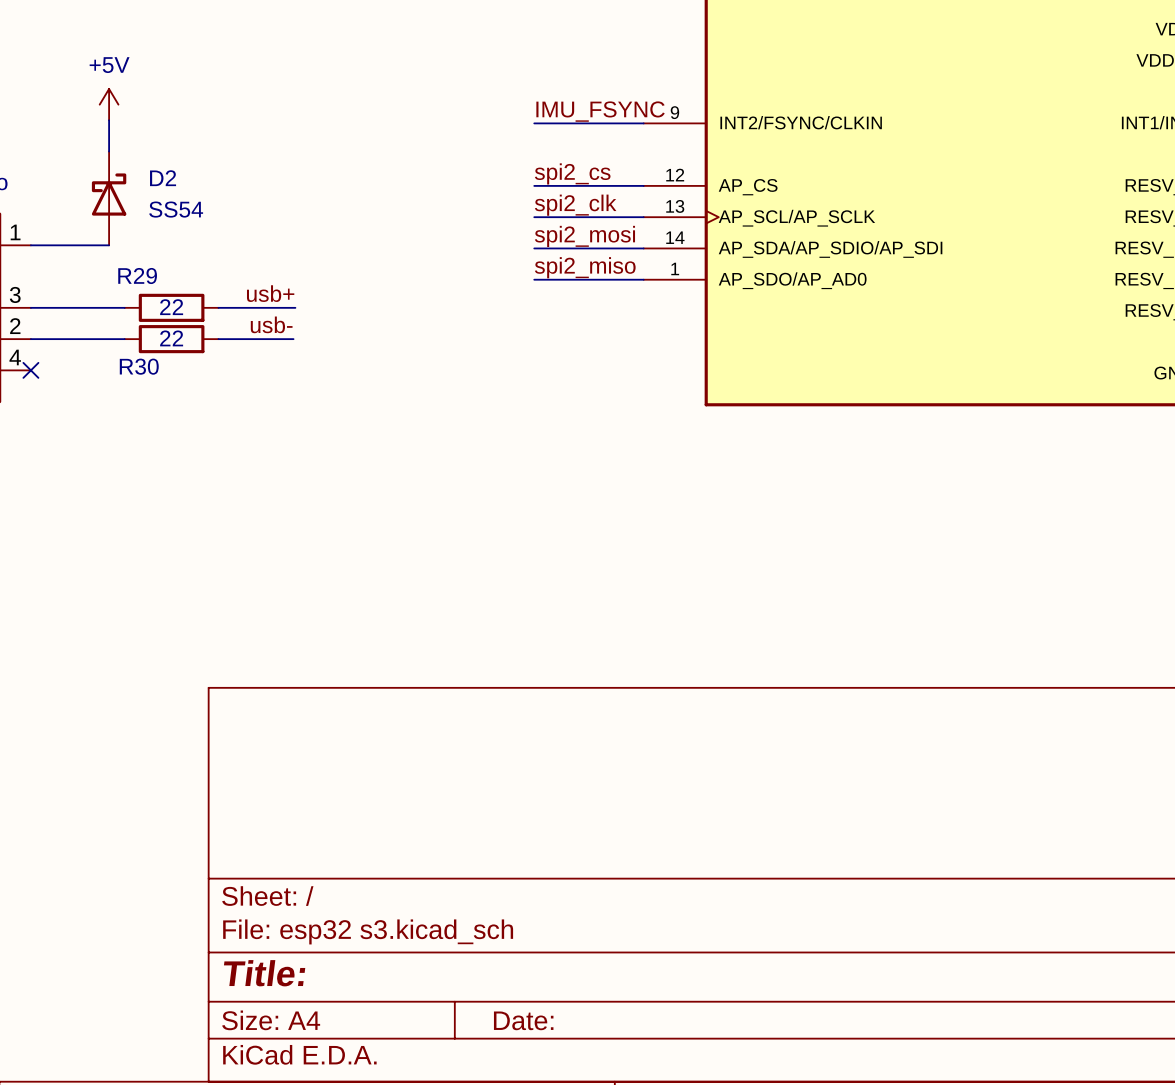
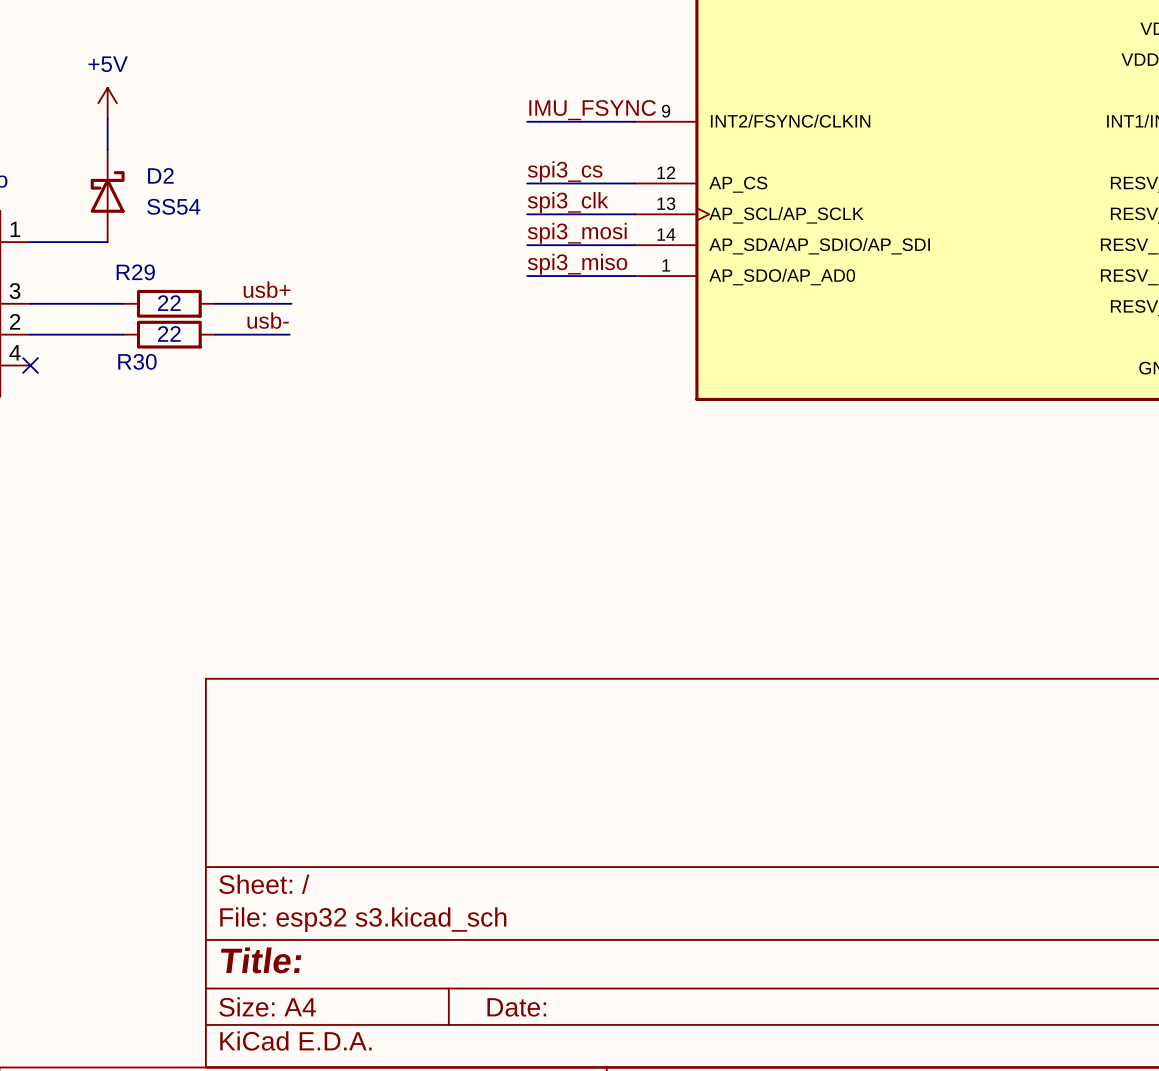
label: spi2_cs (572, 173) -> spi3_cs (565, 171)
label: spi2_clk (575, 205) -> spi3_clk (568, 202)
label: spi2_mosi (584, 236) -> spi3_mosi (577, 233)
label: spi2_miso (585, 267) -> spi3_miso (577, 264)

